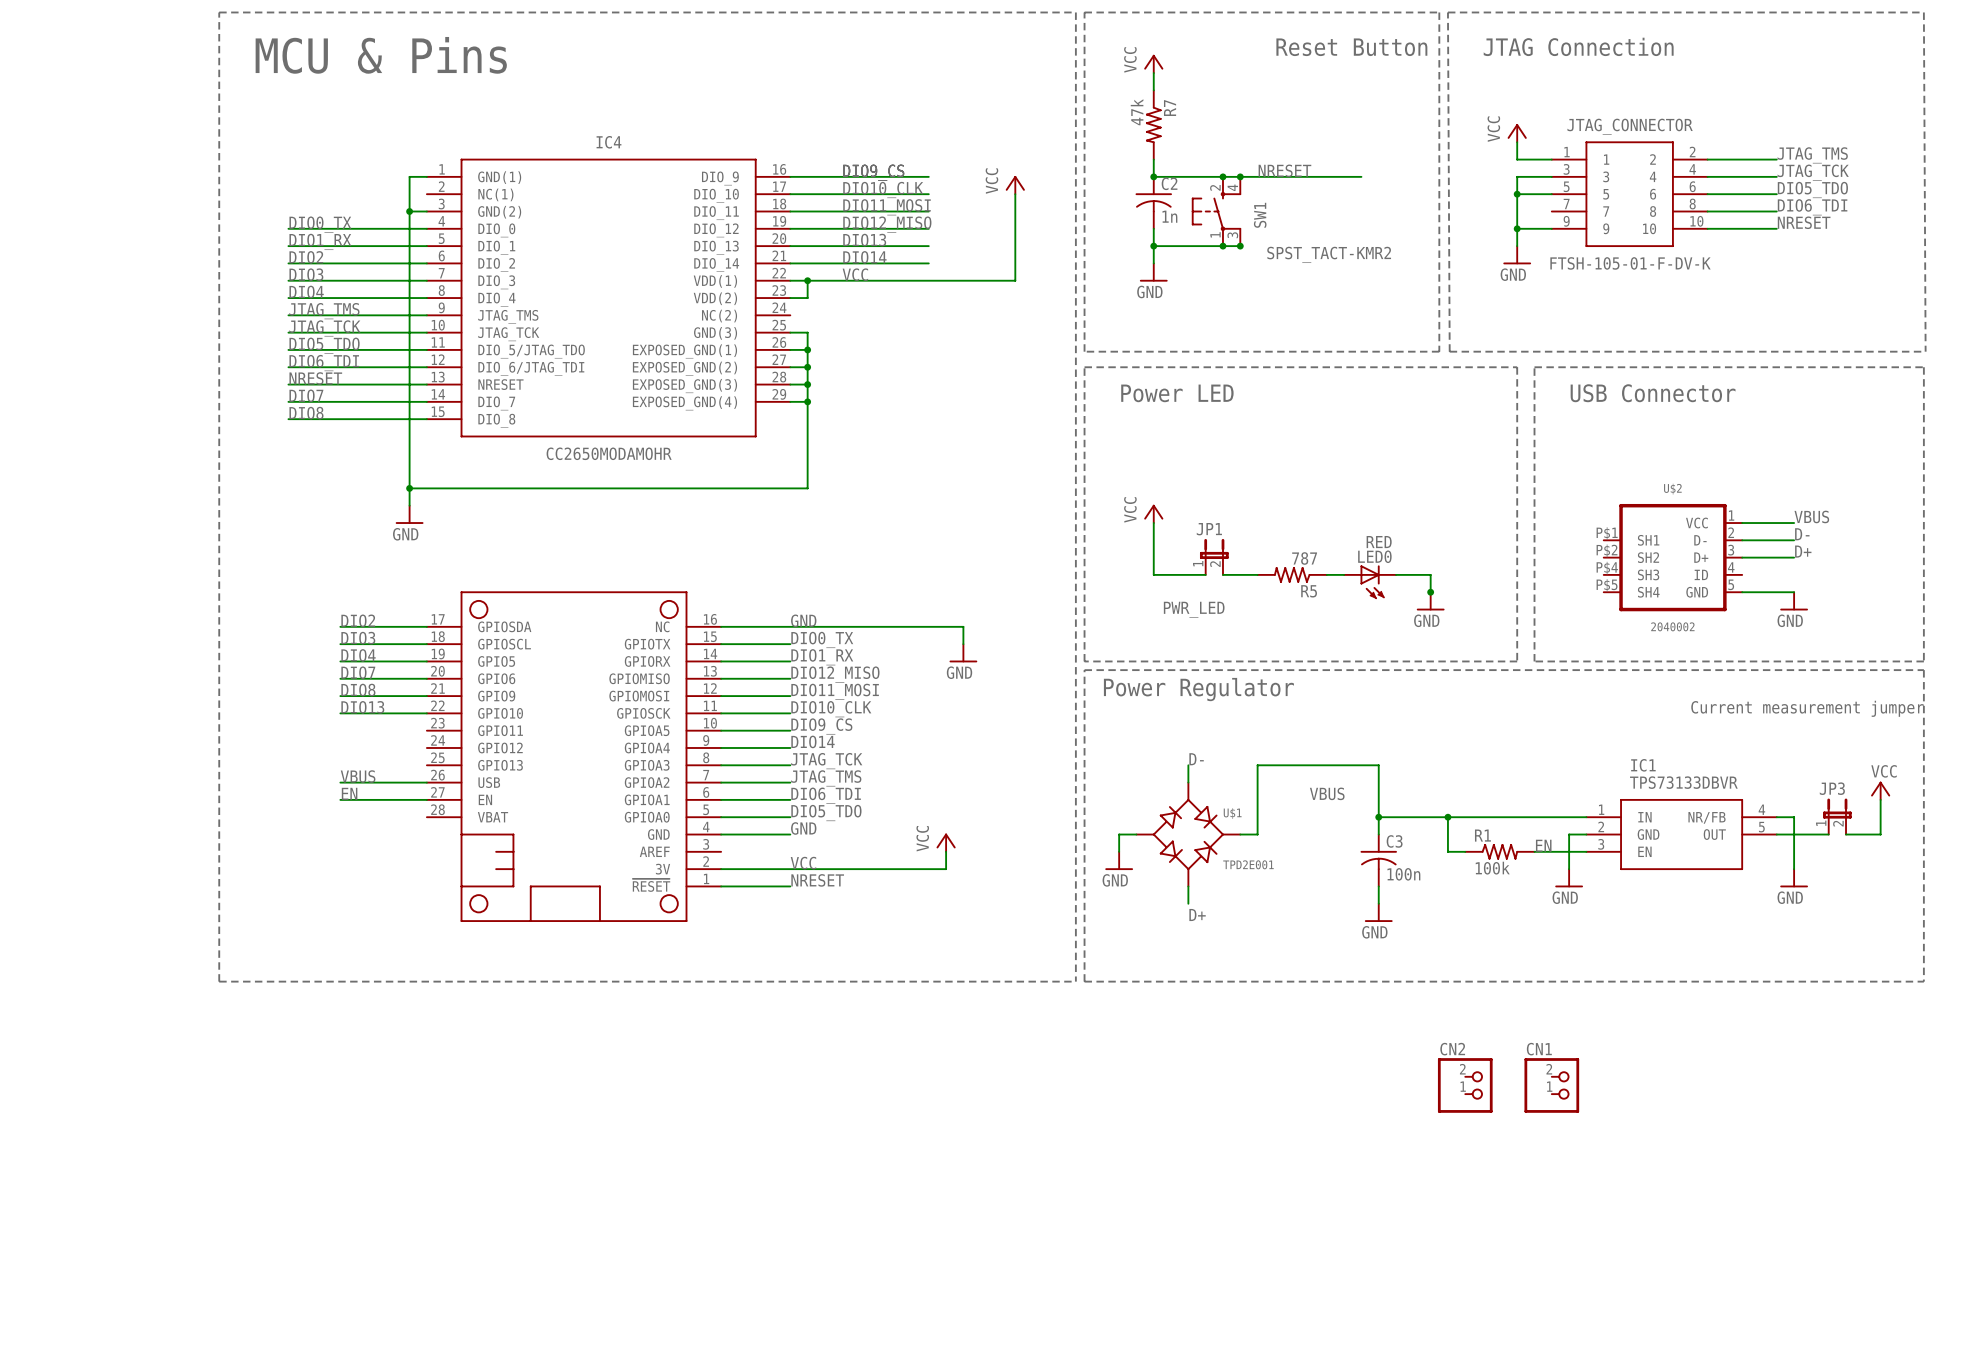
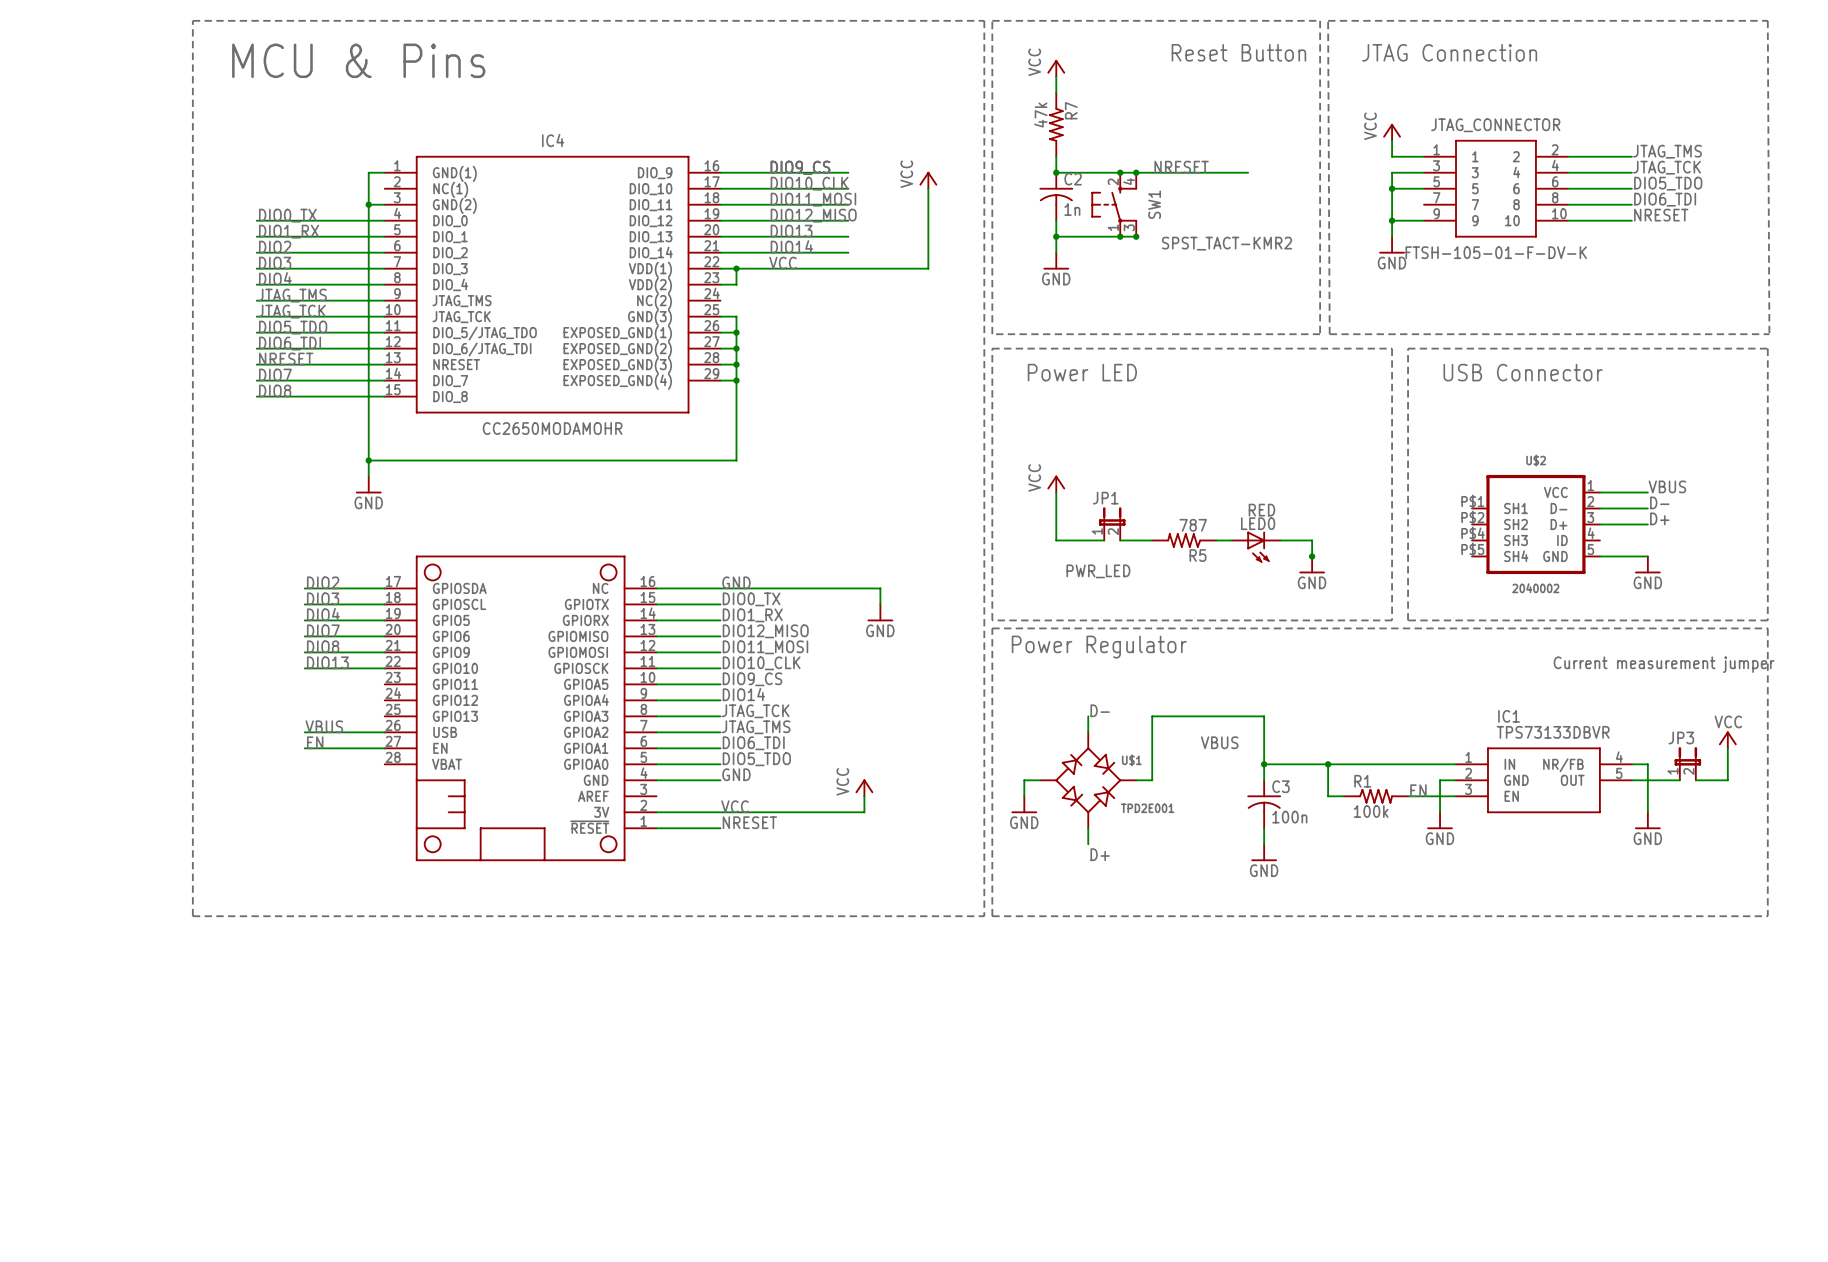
CN2: (1465, 1085) -> none
CN1: (1551, 1085) -> none

